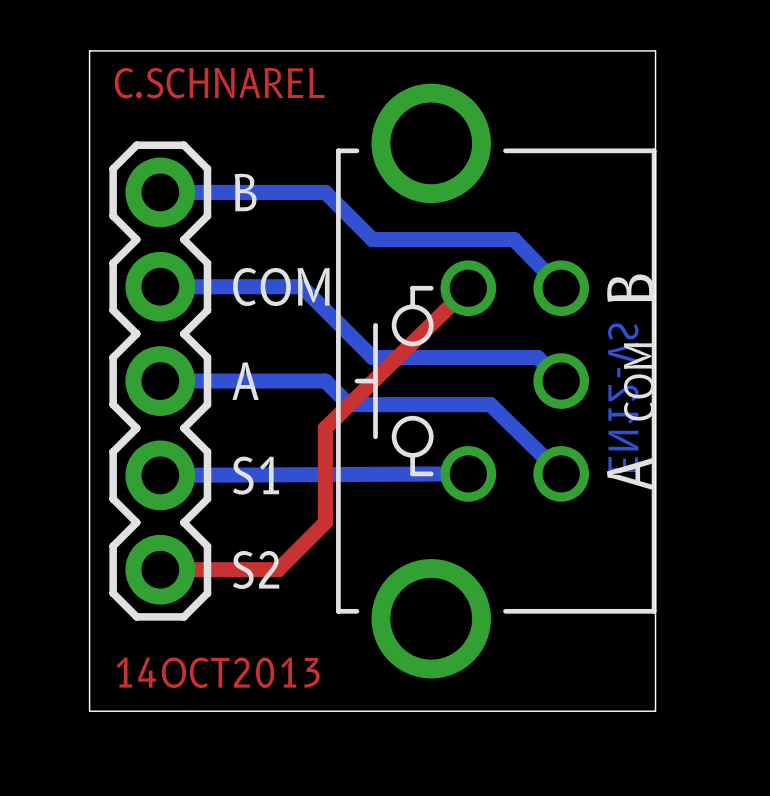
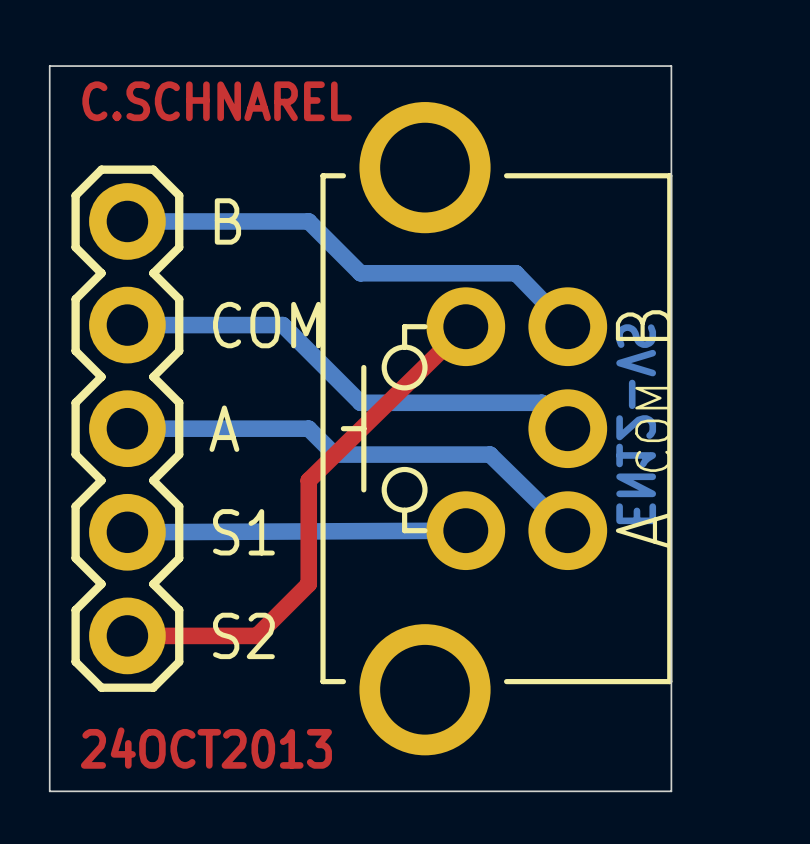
part footprint: [336, 83, 657, 679] -> [320, 102, 673, 756]
text: 14OCT2013 (218, 672) -> 24OCT2013 (206, 748)

